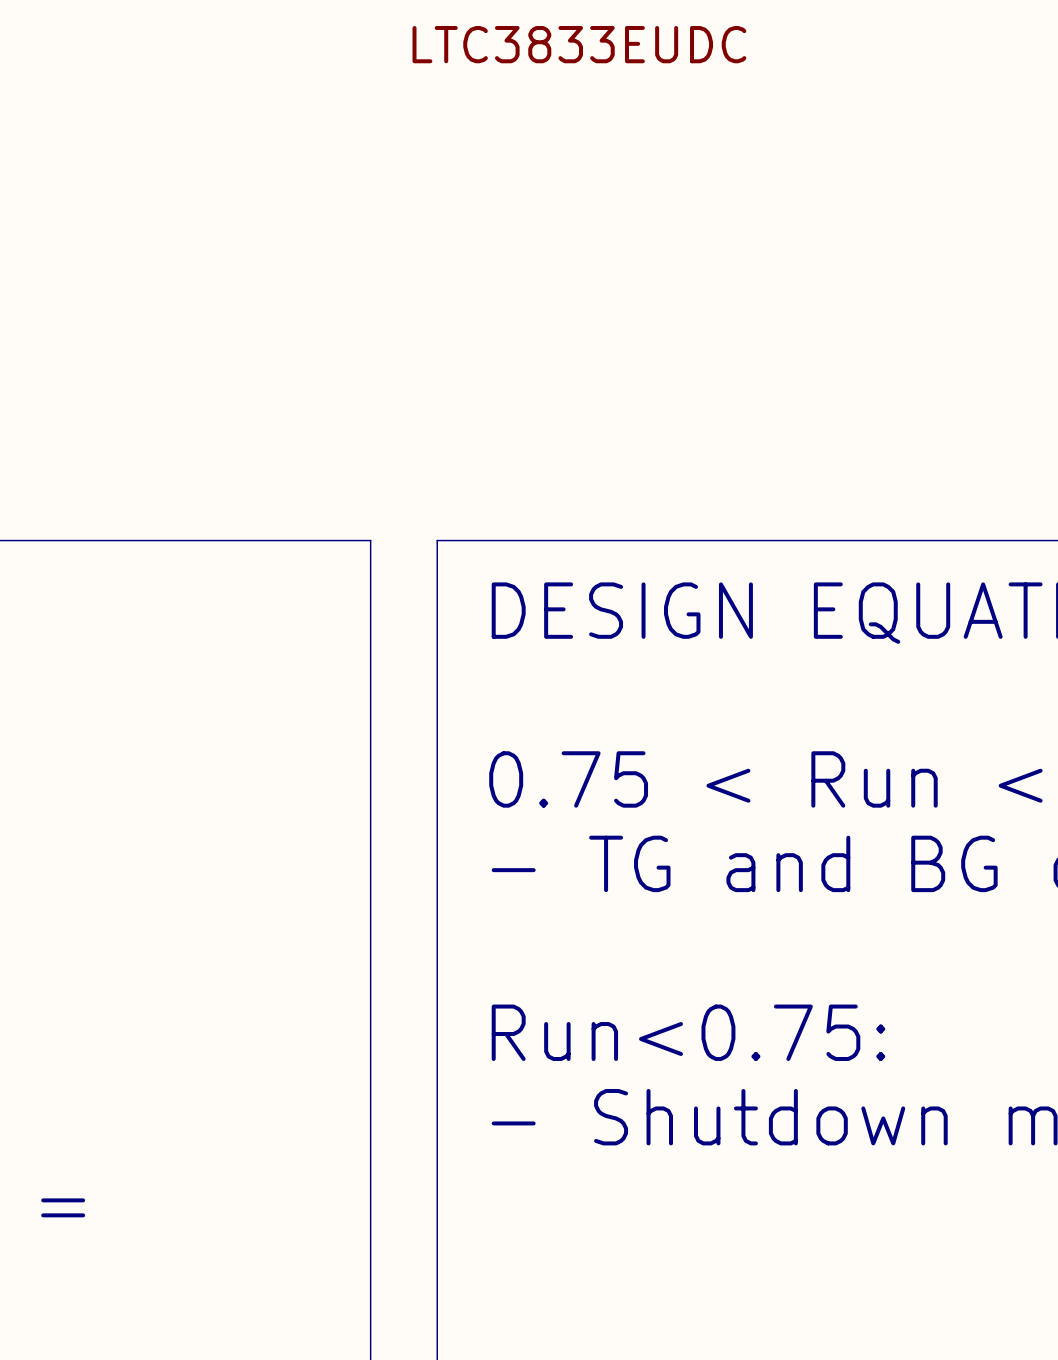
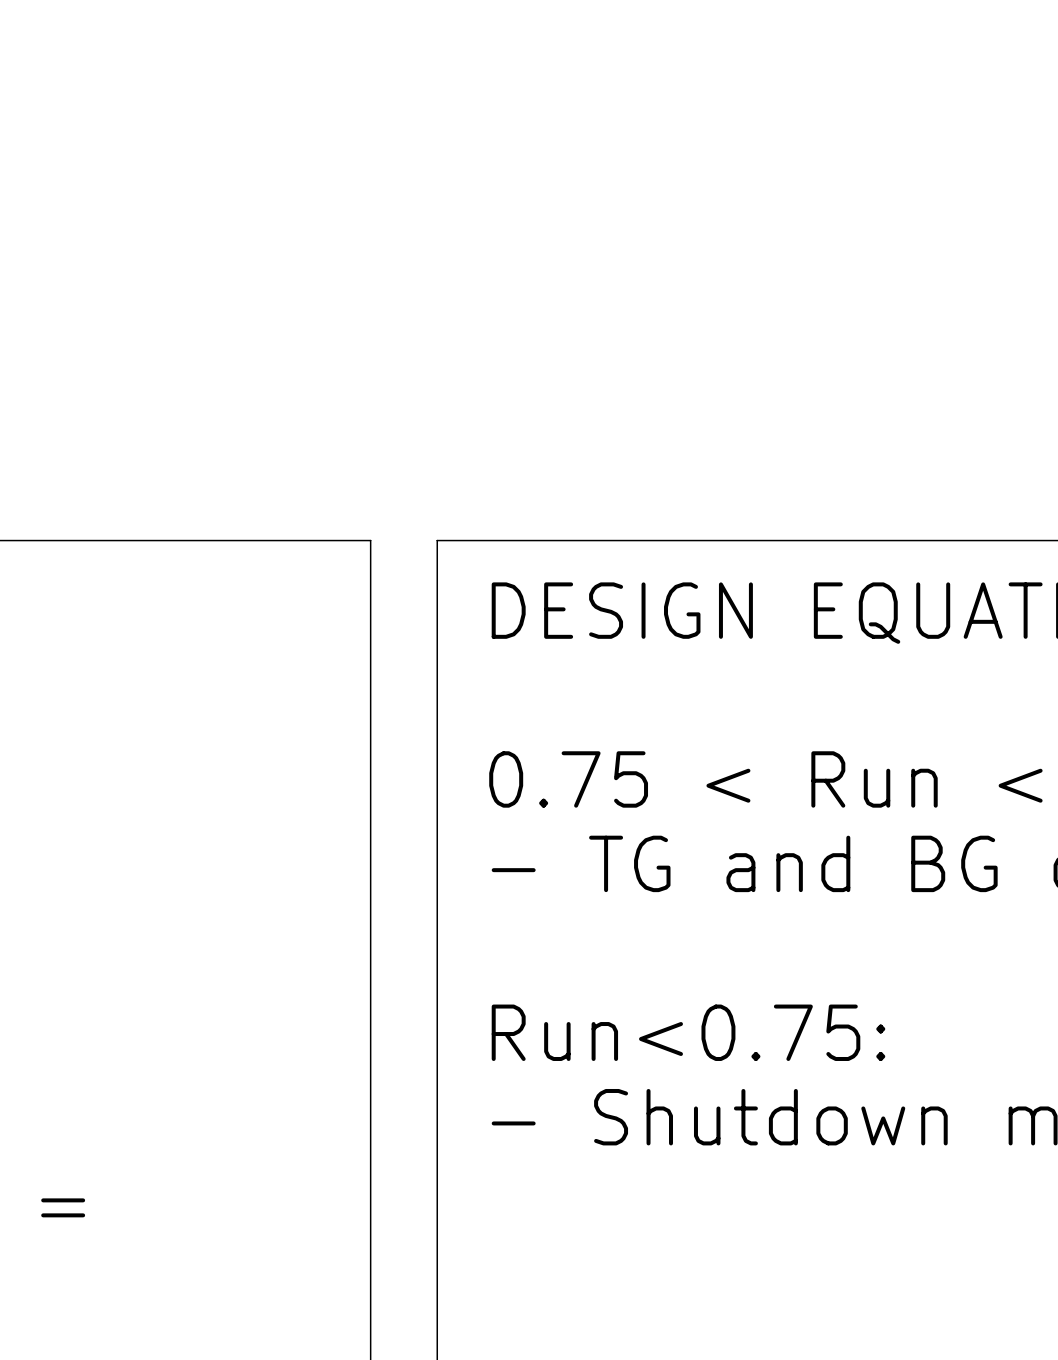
label: LTC3833EUDC (579, 44) -> none

